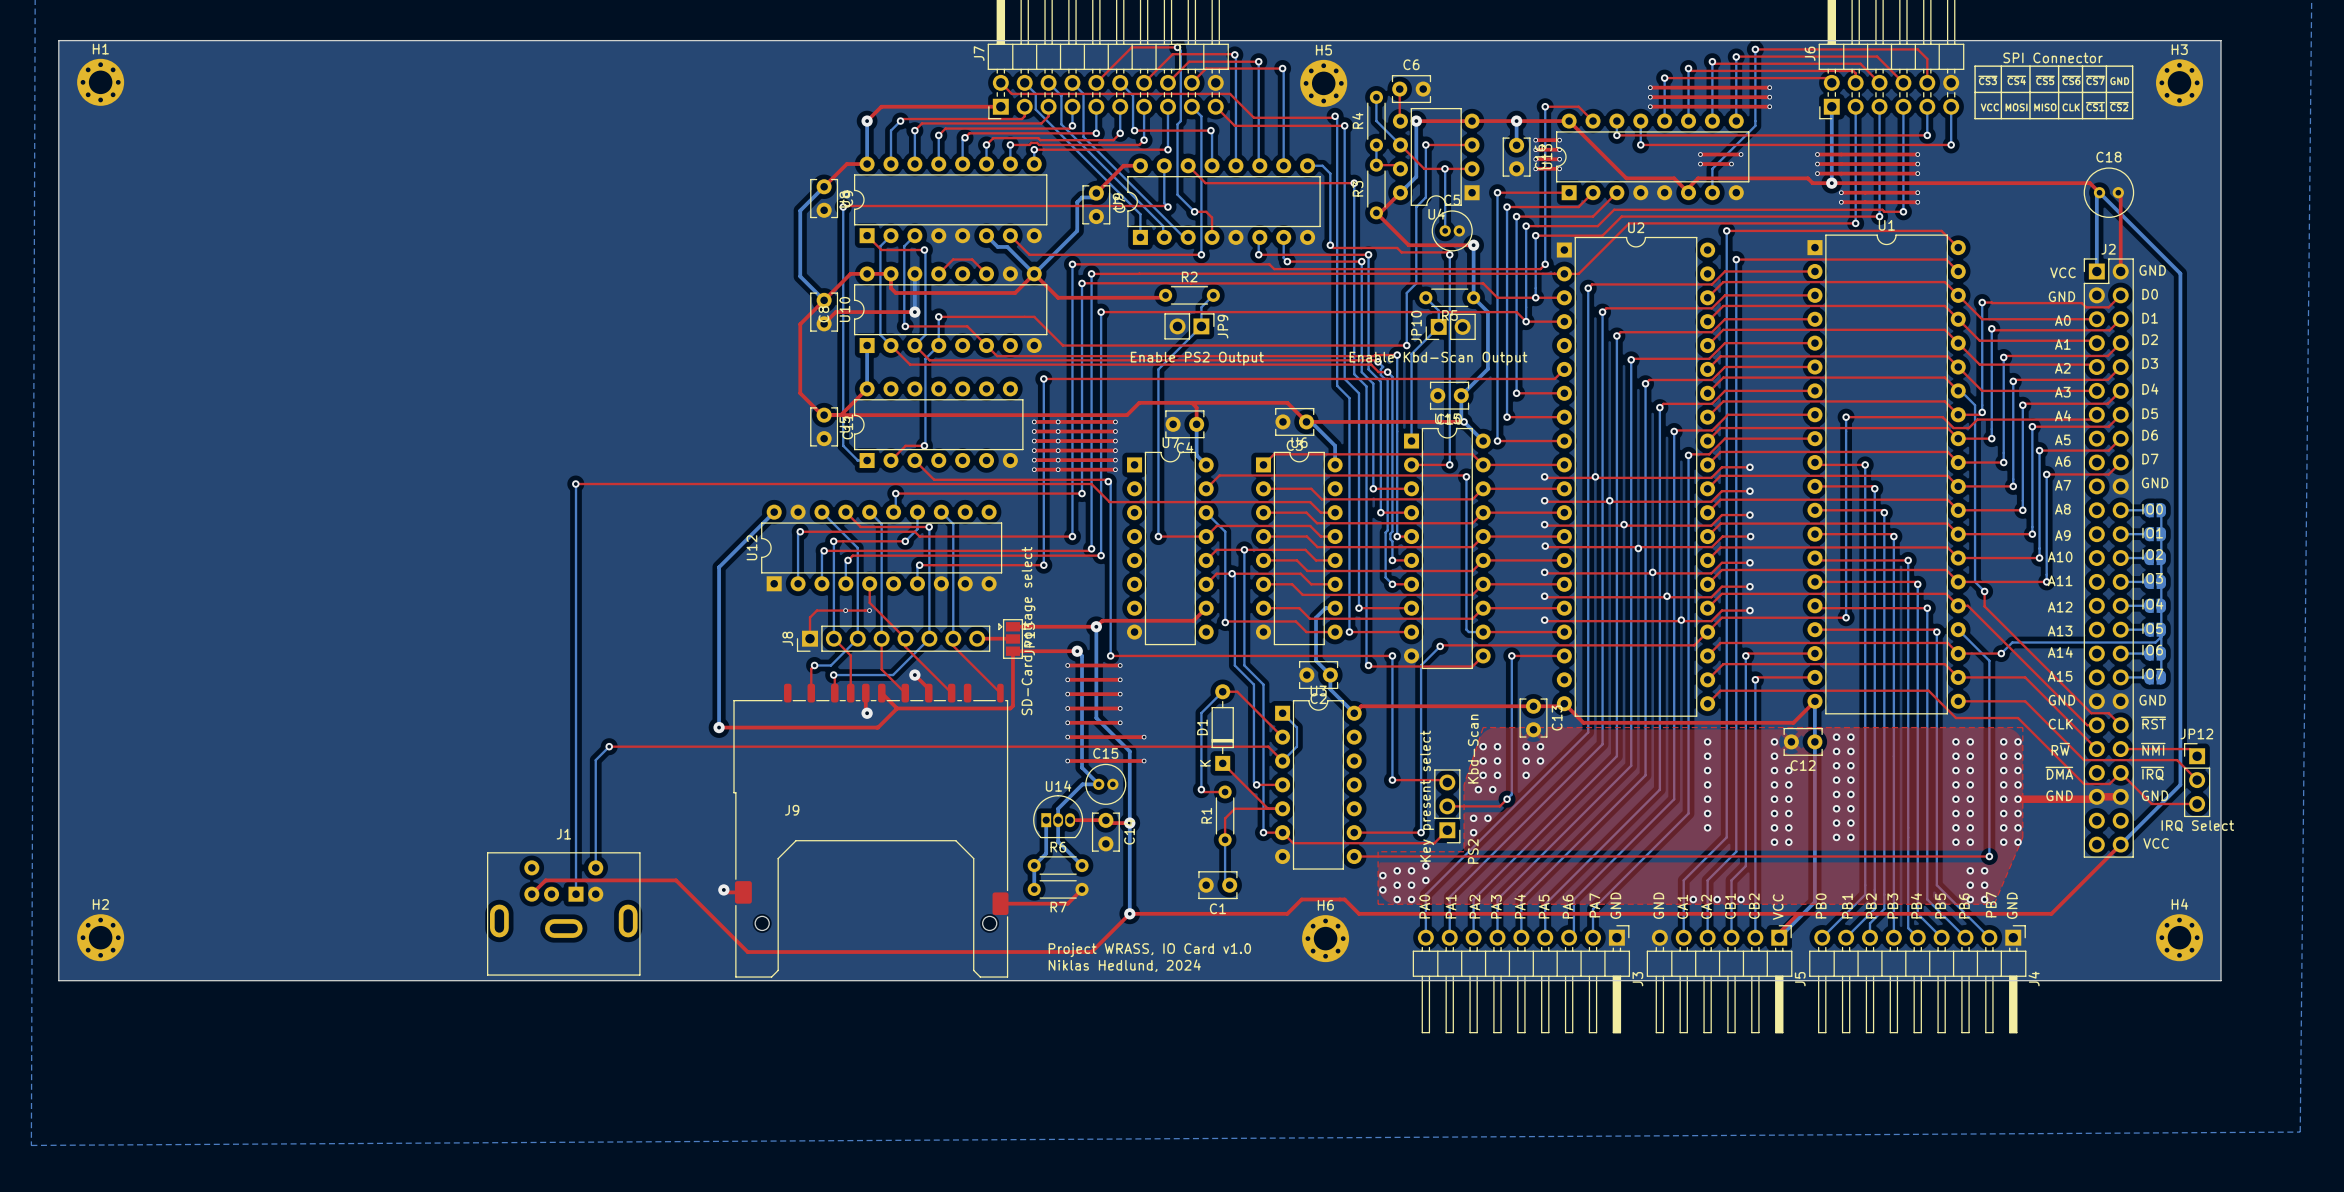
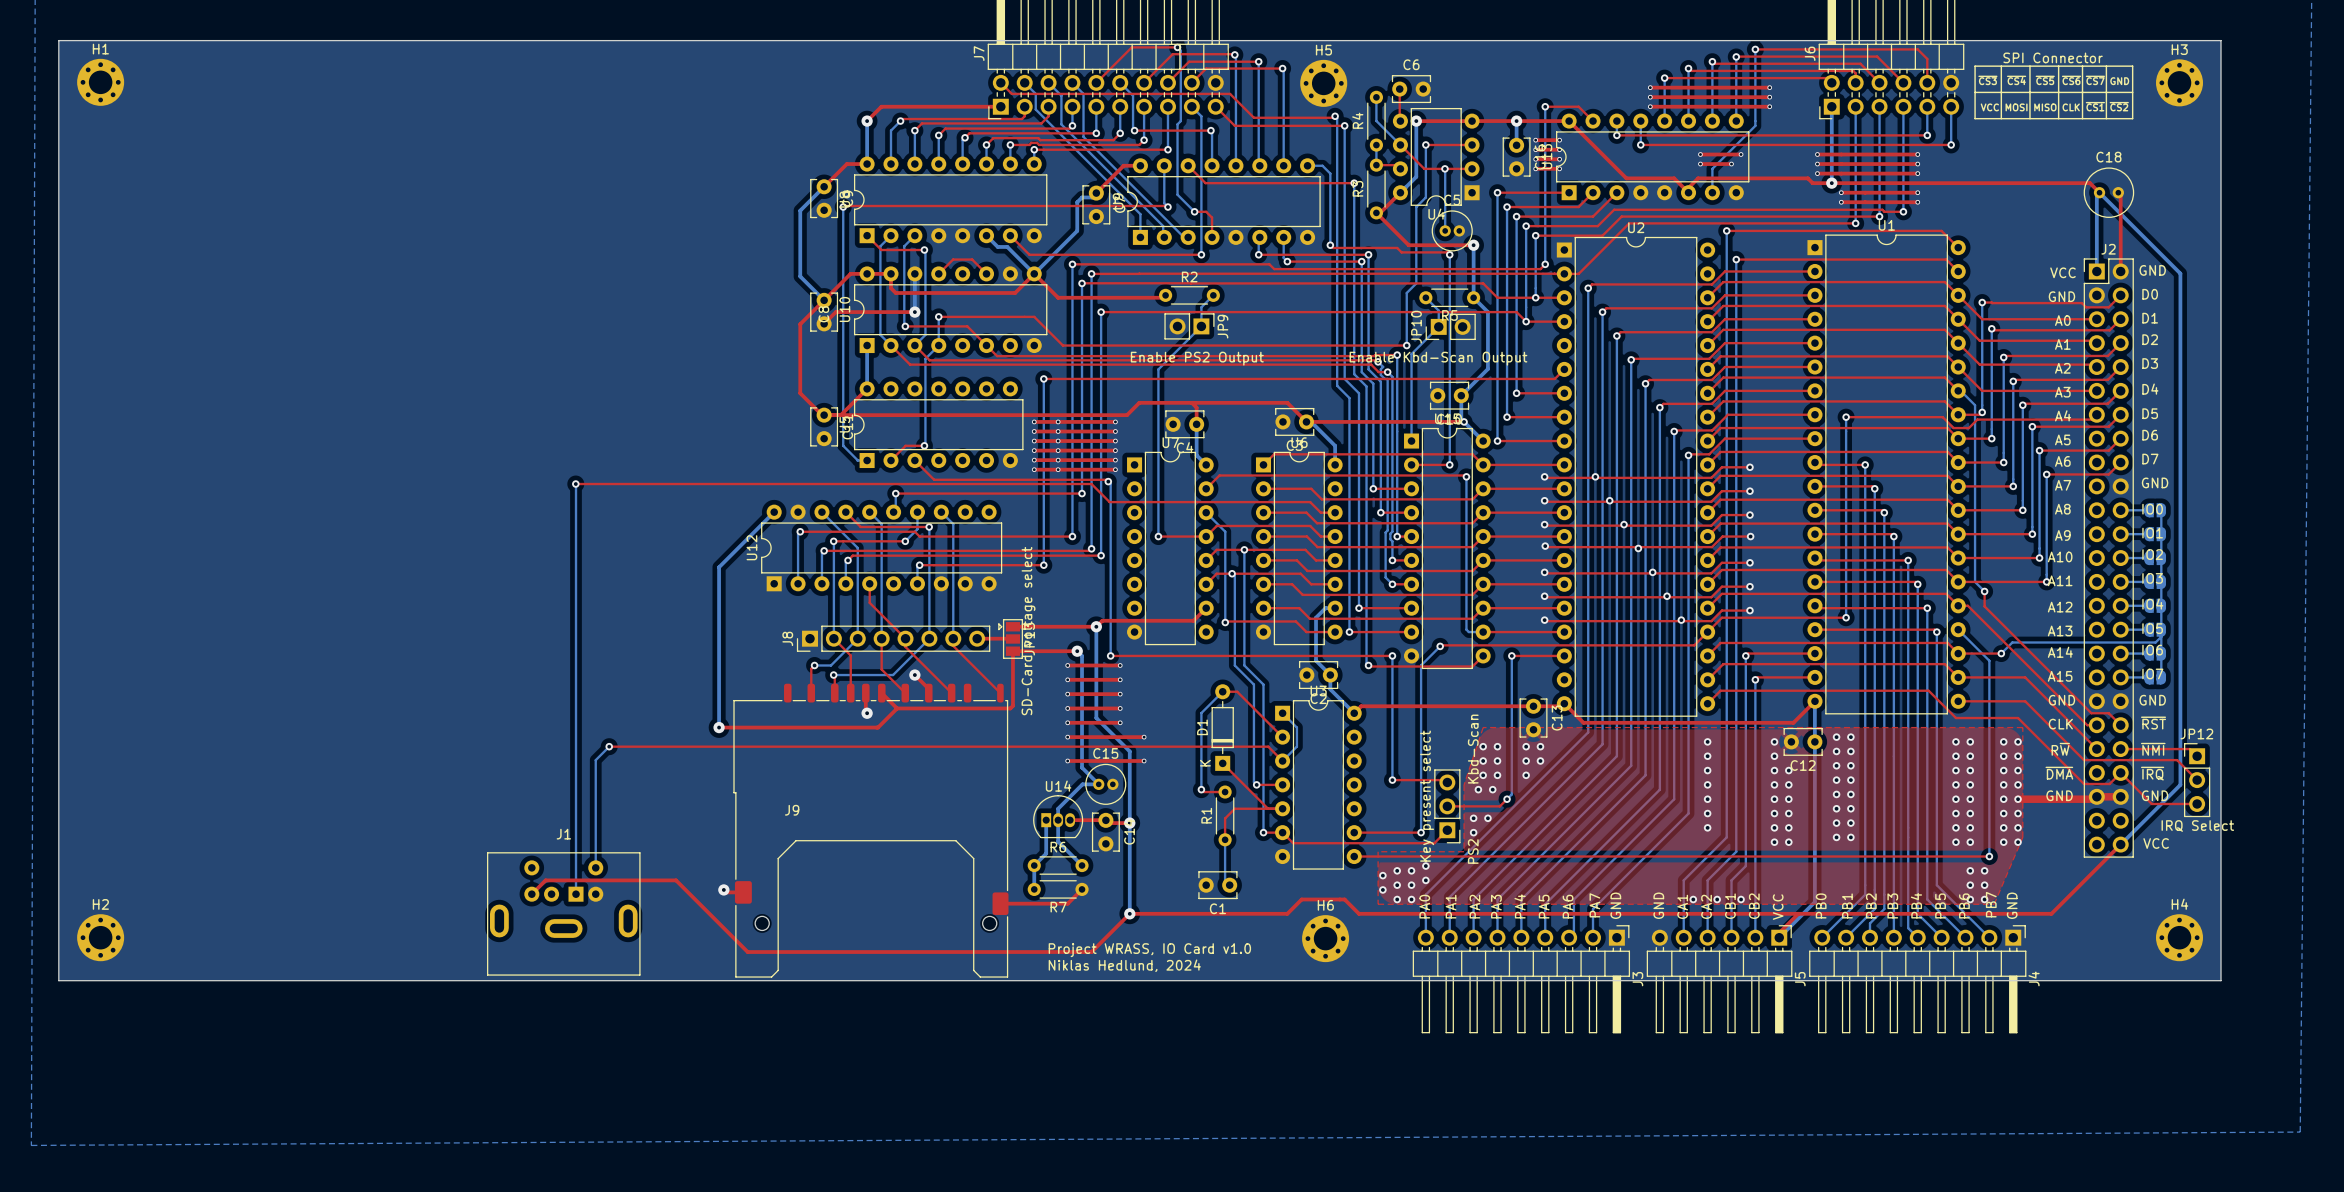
via: (845, 610) -> none
top track: (869, 610) (816, 610) (810, 617) (810, 638) -> none
via: (869, 610) -> none

